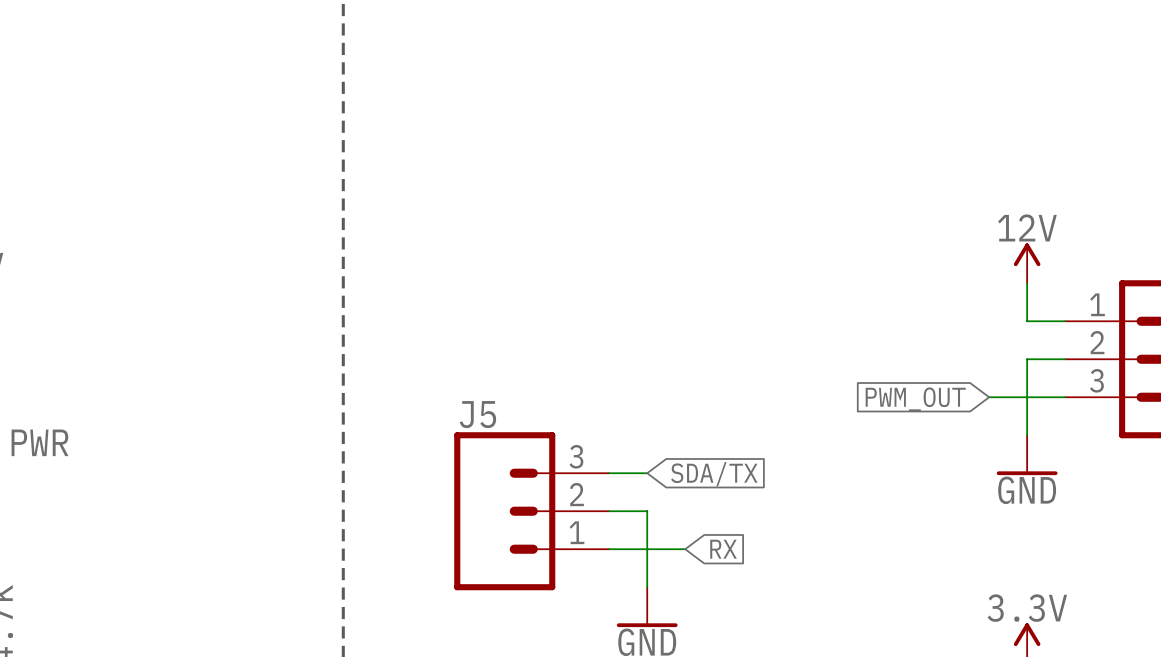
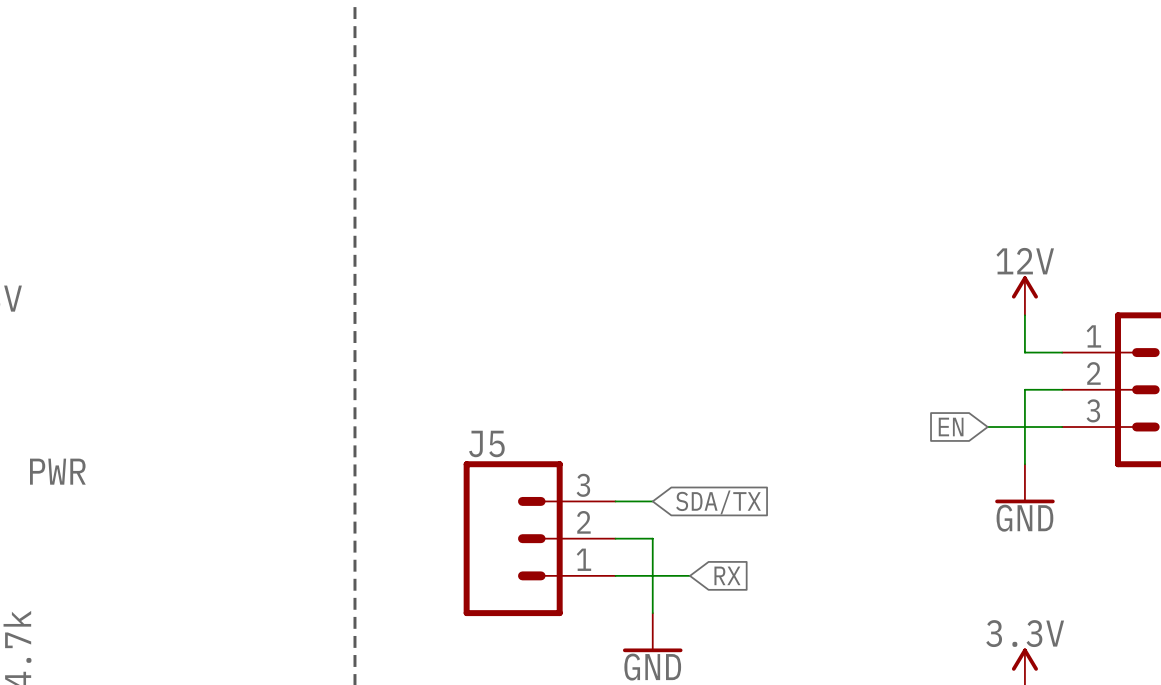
global label: PWM_OUT (915, 399) -> EN (951, 427)

